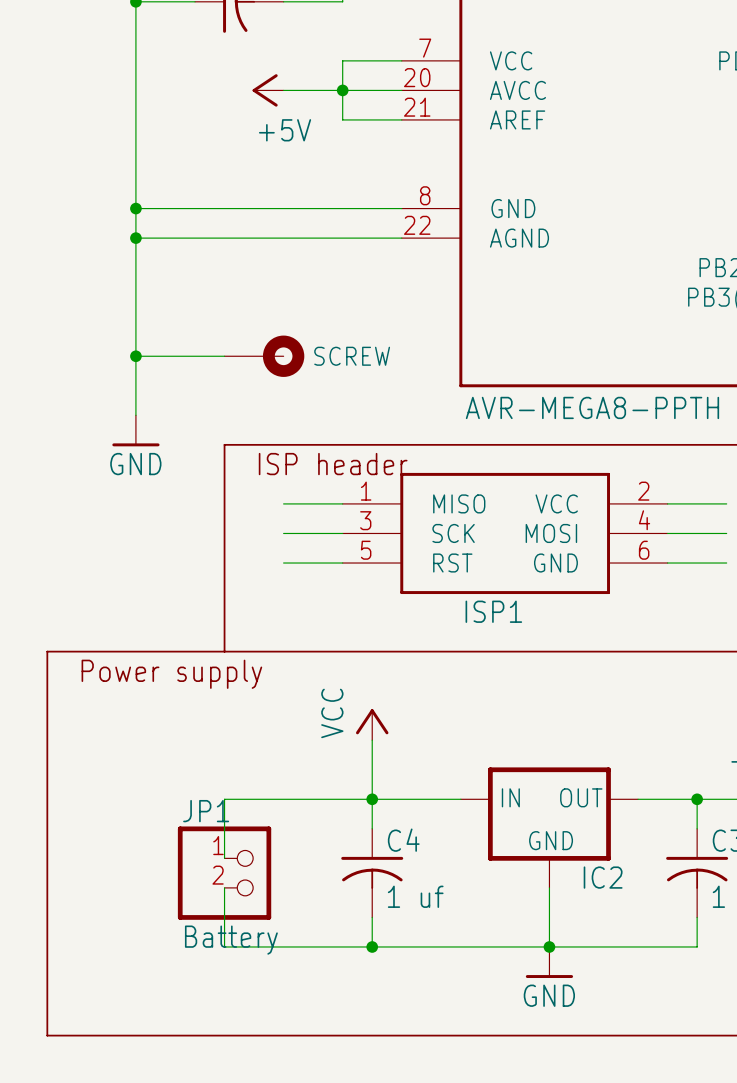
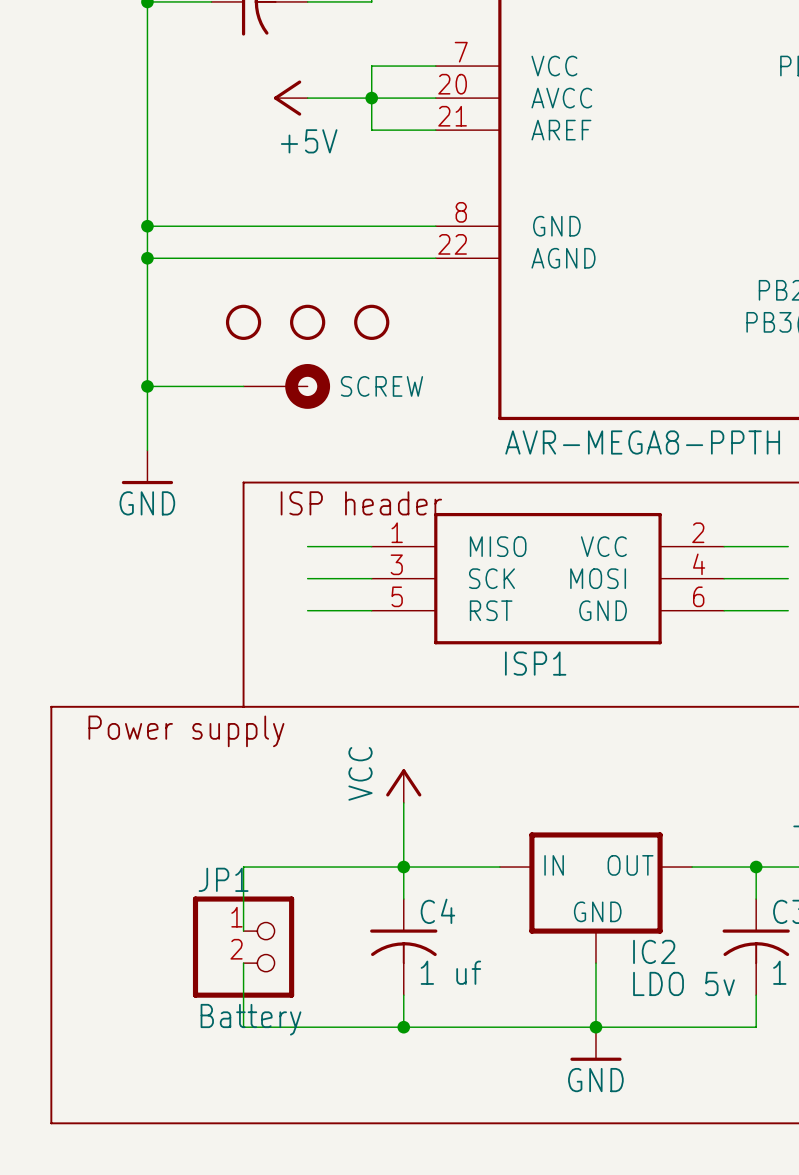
part: none -> (243, 322)
part: none -> (307, 322)
part: none -> (371, 322)
IC2 value: none -> LDO 5v (683, 983)

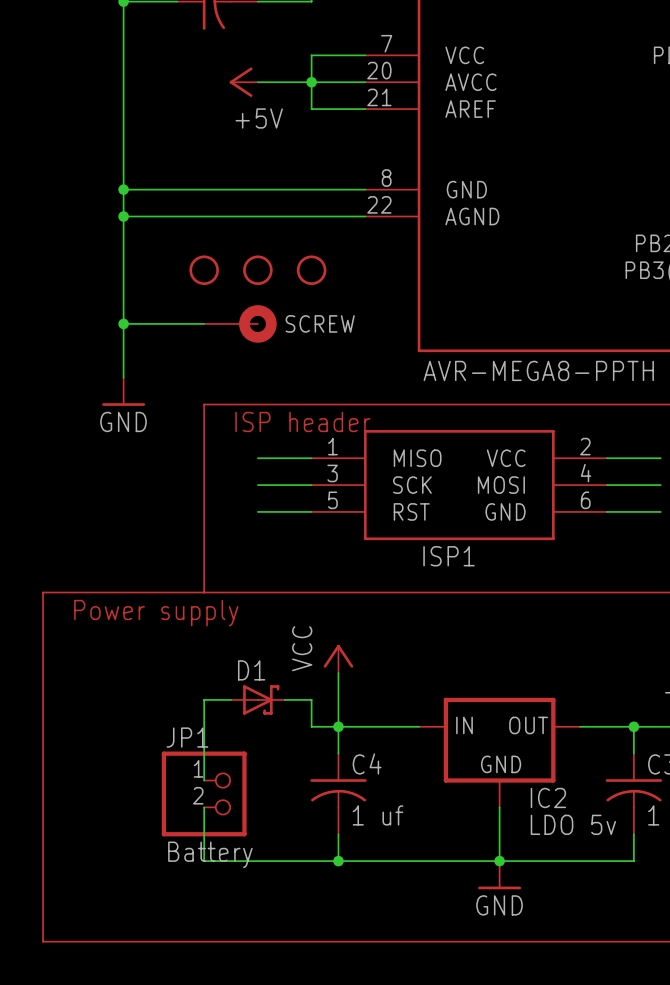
D1: none -> (257, 699)
wire: none -> (284, 699) (311, 699) (311, 726)
wire: (243, 867) (371, 867) -> (204, 726) (204, 699) (231, 699)

